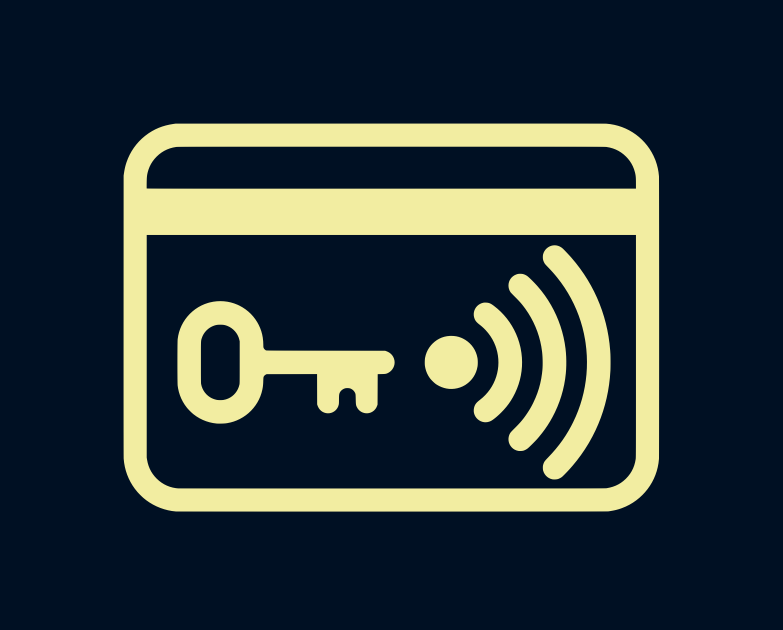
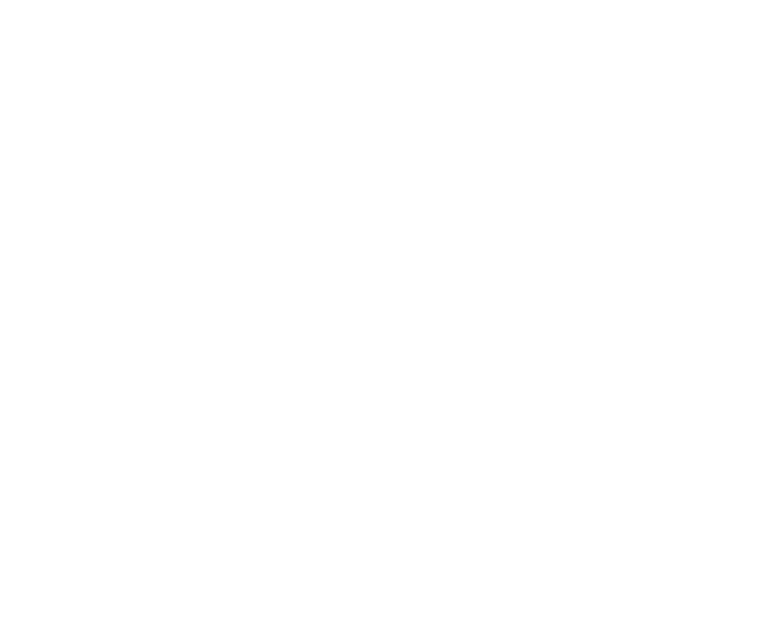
drawing: [123, 123, 660, 512] -> none

